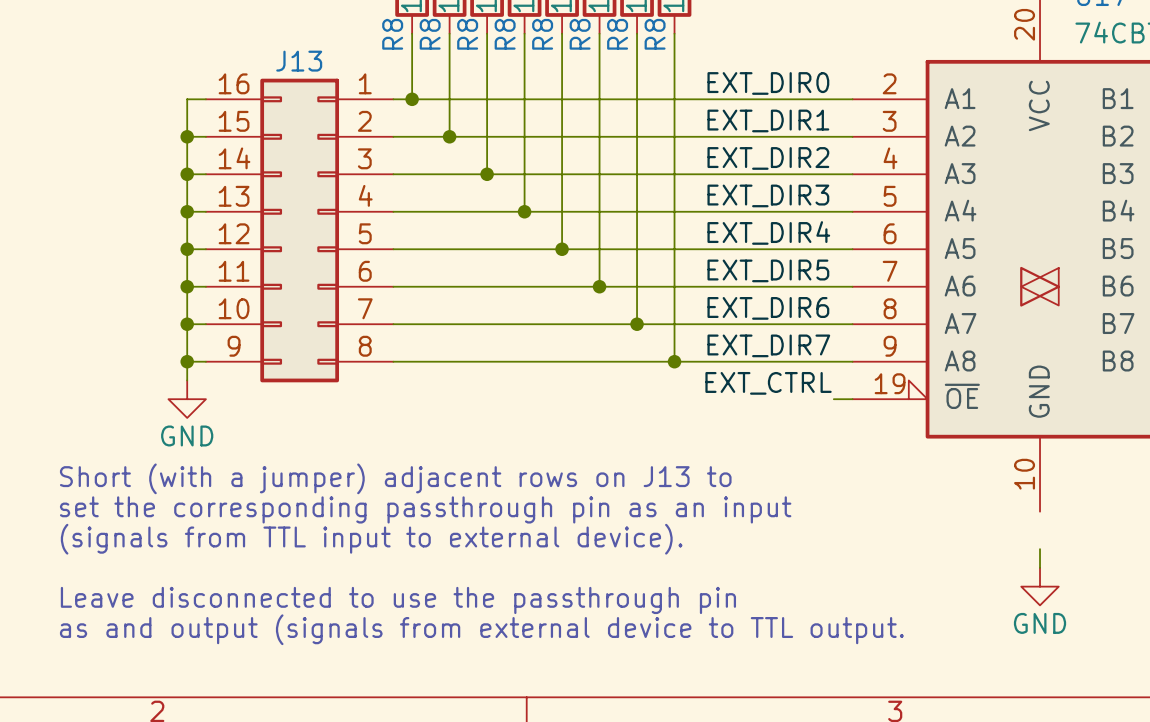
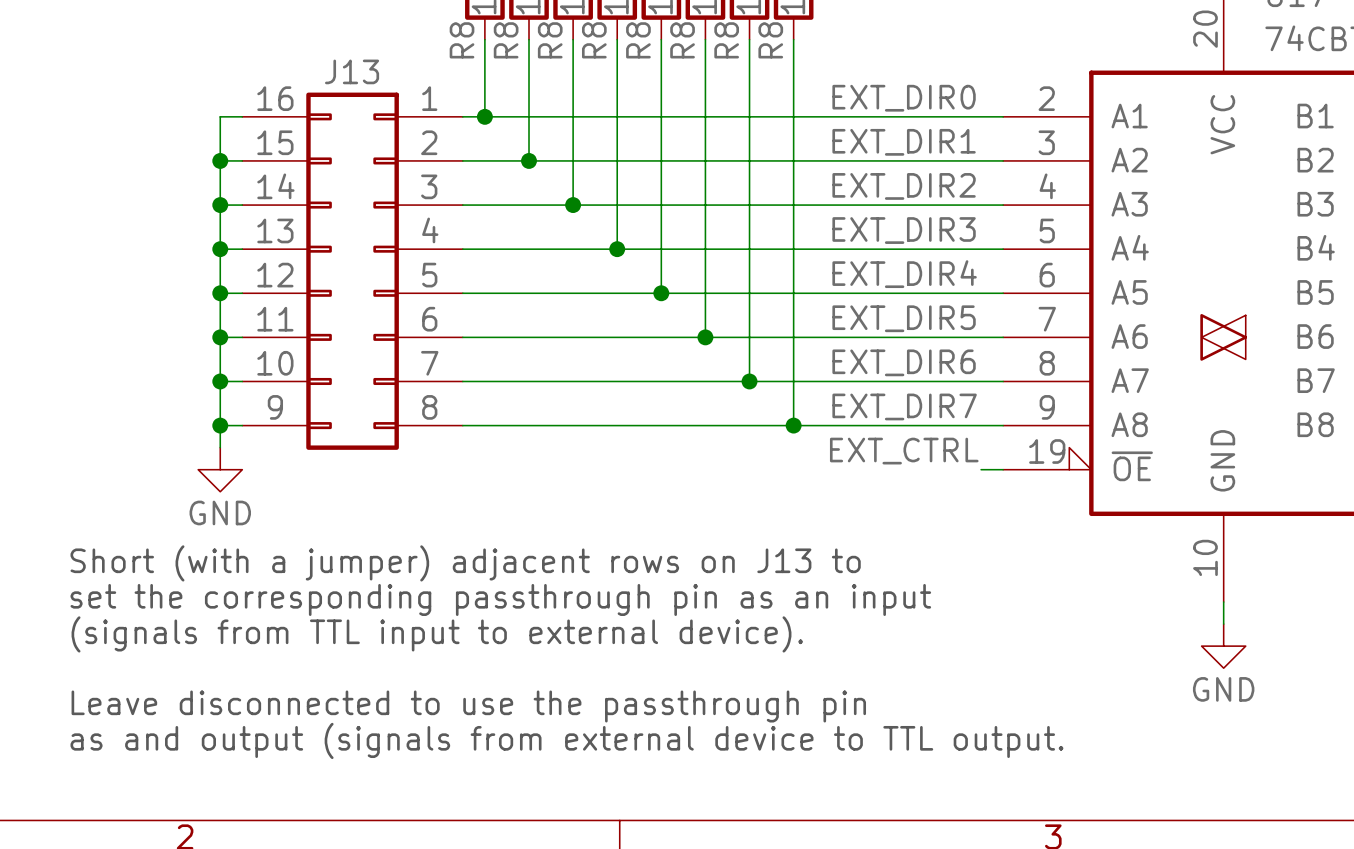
wire: (1040, 549) (1040, 567) -> (1223, 602) (1223, 624)
power symbol position: GND (1040, 586) -> GND (1223, 646)

